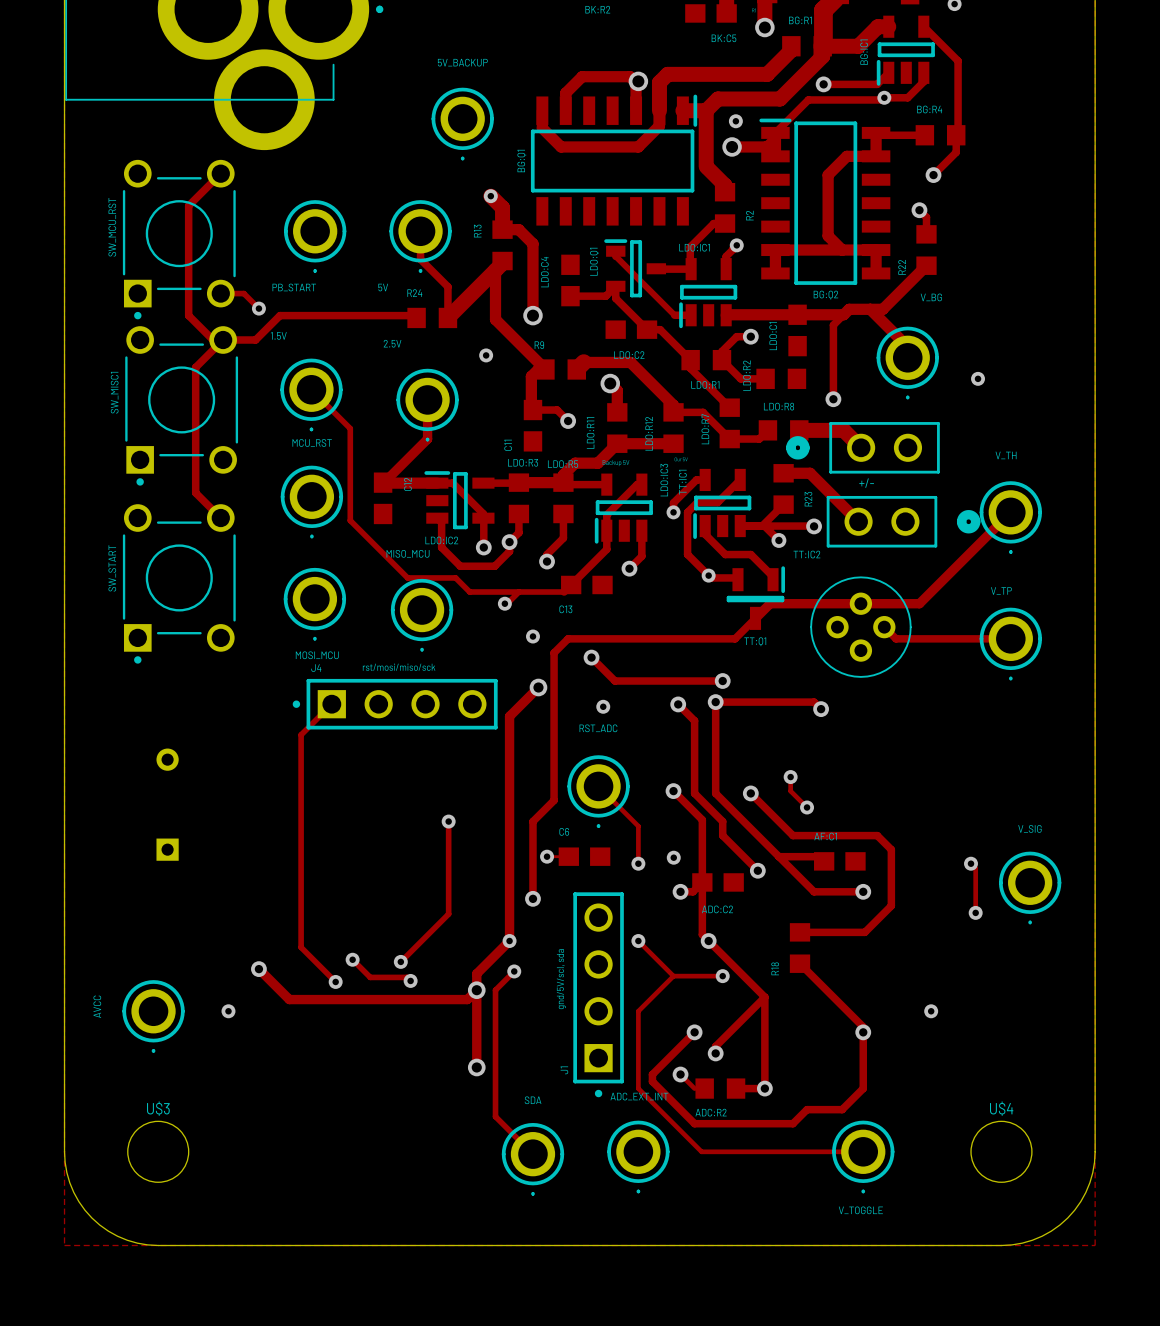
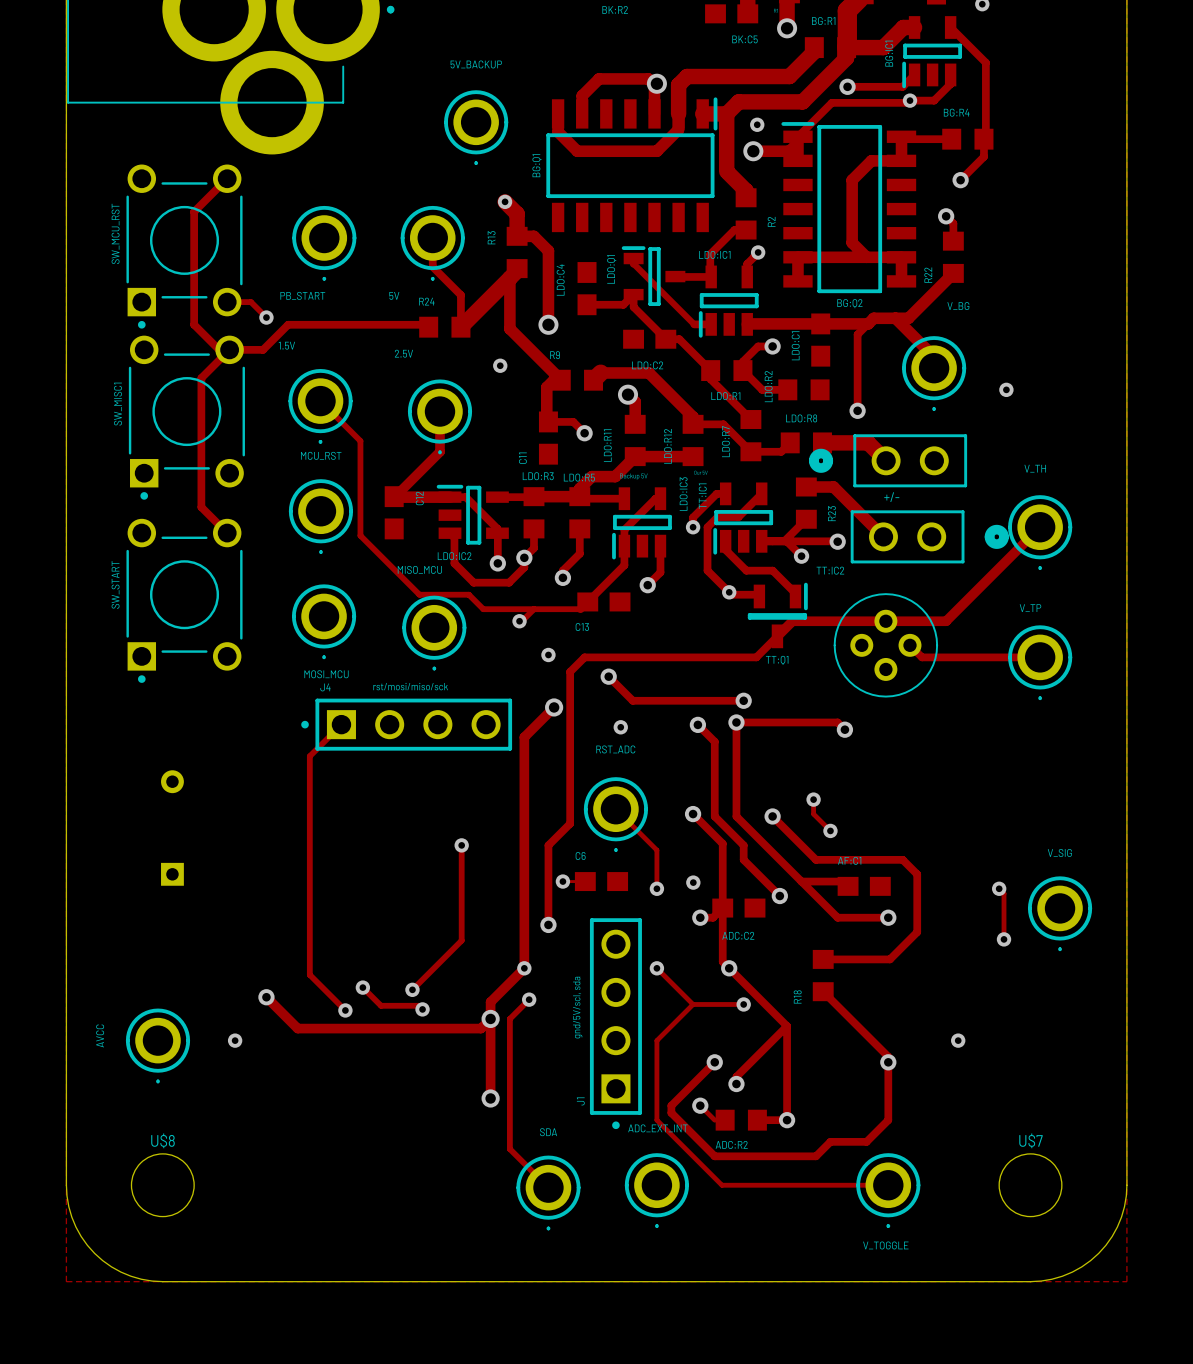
U$3 name: U$3 (158, 1108) -> U$8 (162, 1140)
U$4 name: U$4 (1001, 1108) -> U$7 (1030, 1140)

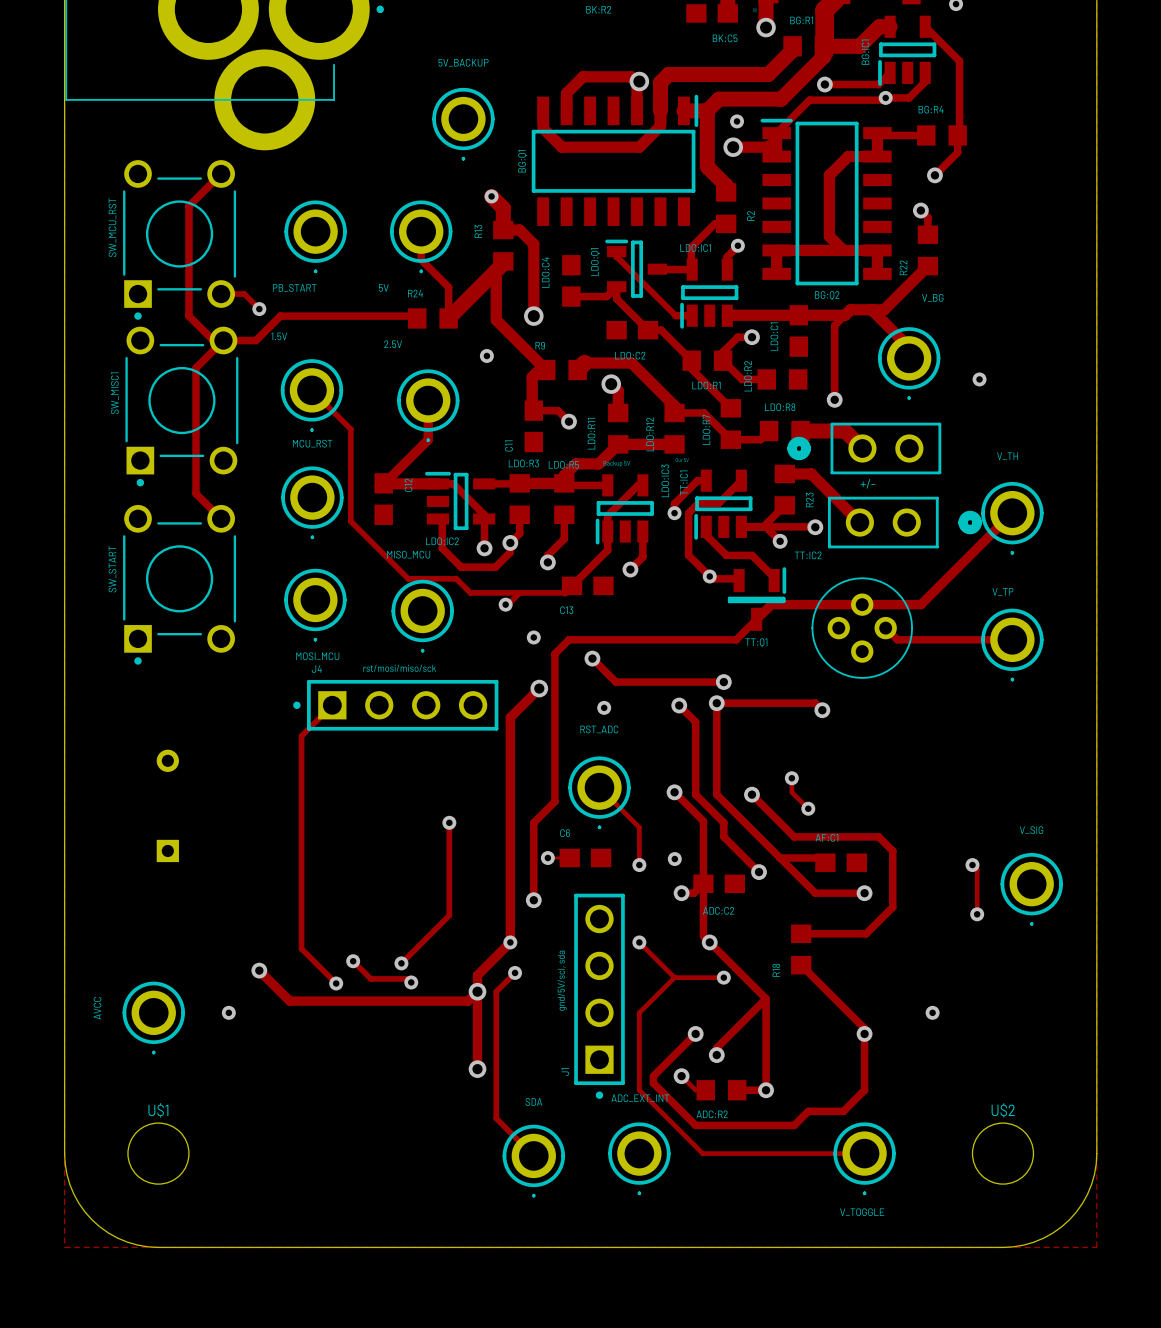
U$8 name: U$8 (162, 1140) -> U$1 (158, 1110)
U$7 name: U$7 (1030, 1140) -> U$2 (1003, 1110)

